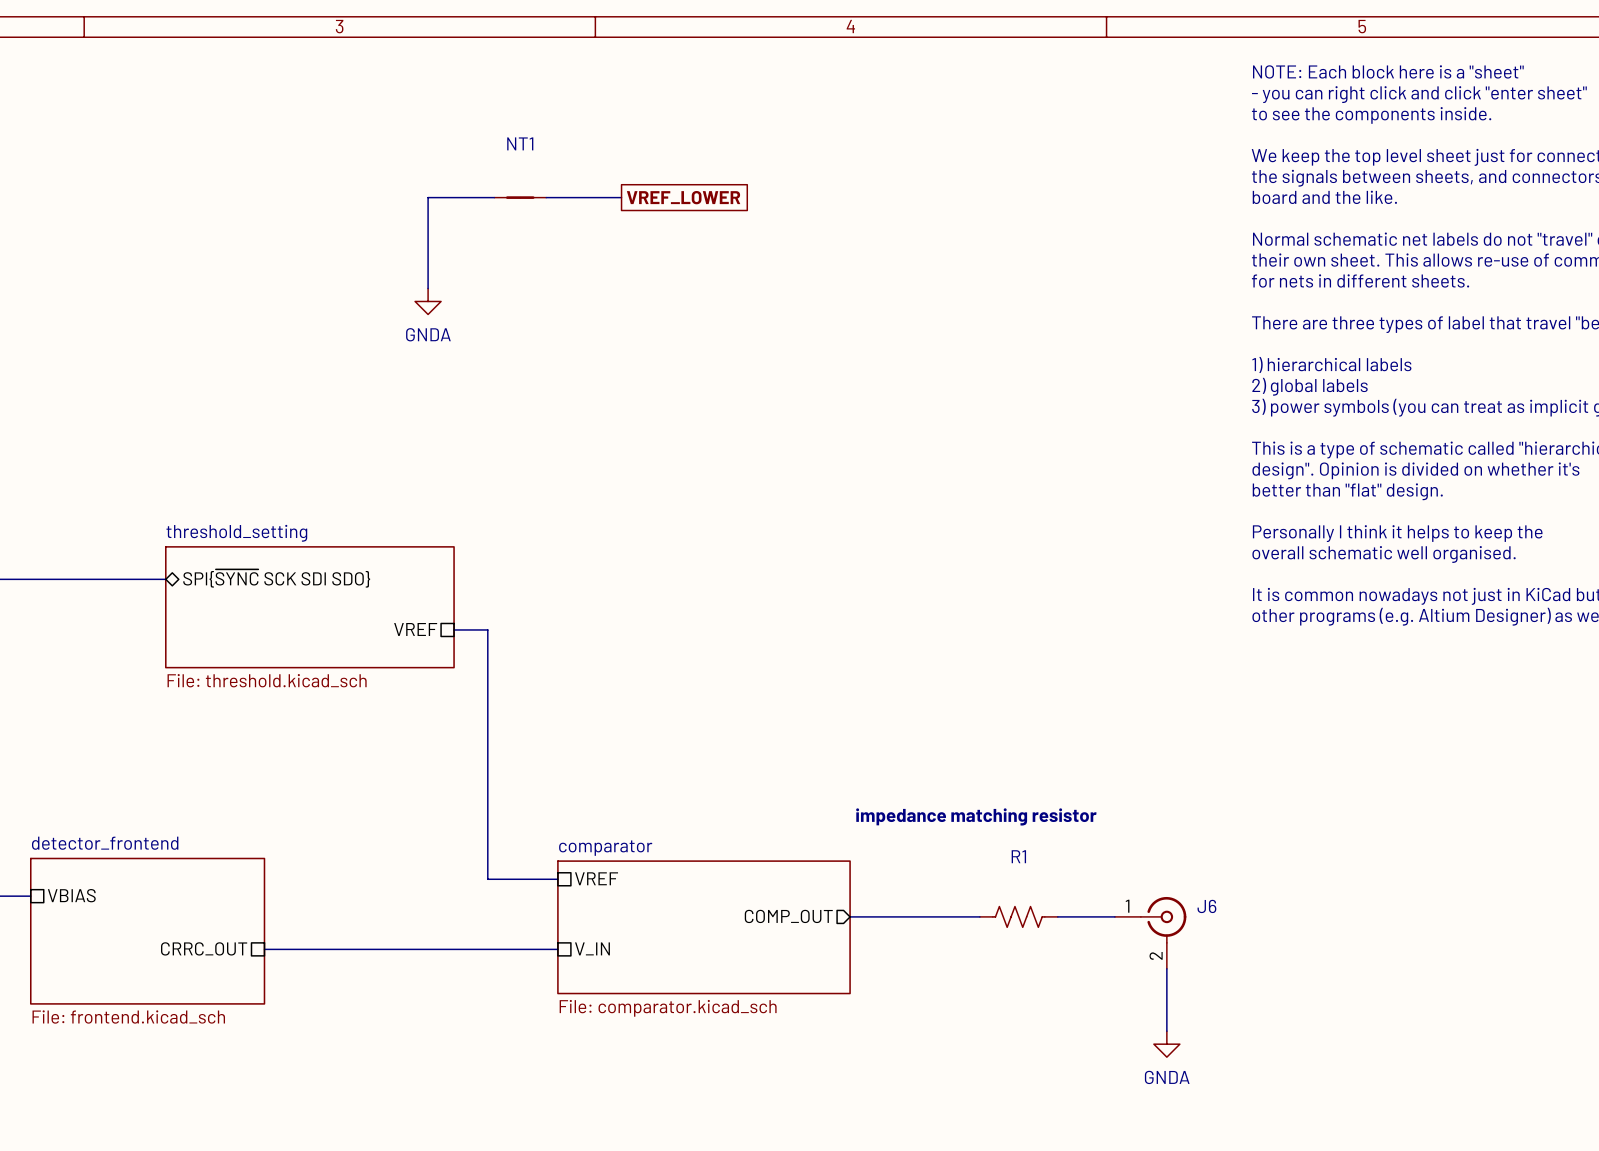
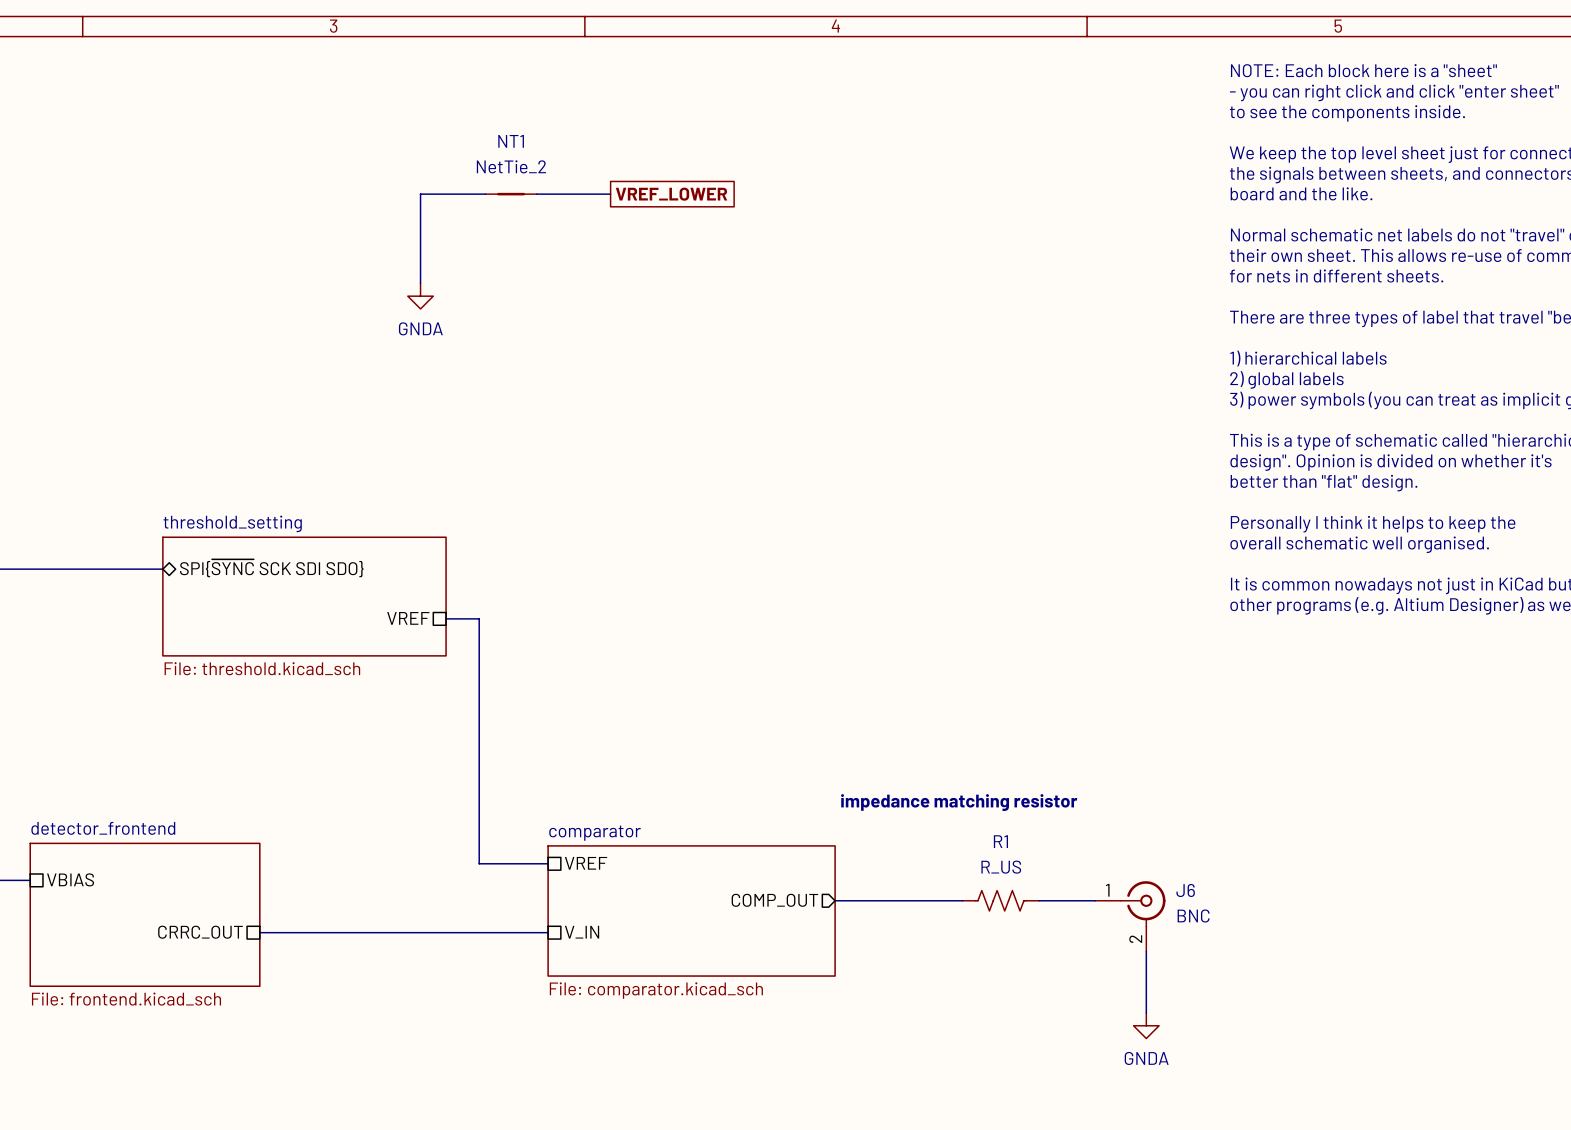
NT1 value: none -> NetTie_2 (511, 166)
R1 value: none -> R_US (1001, 867)
J6 value: none -> BNC (1193, 916)

